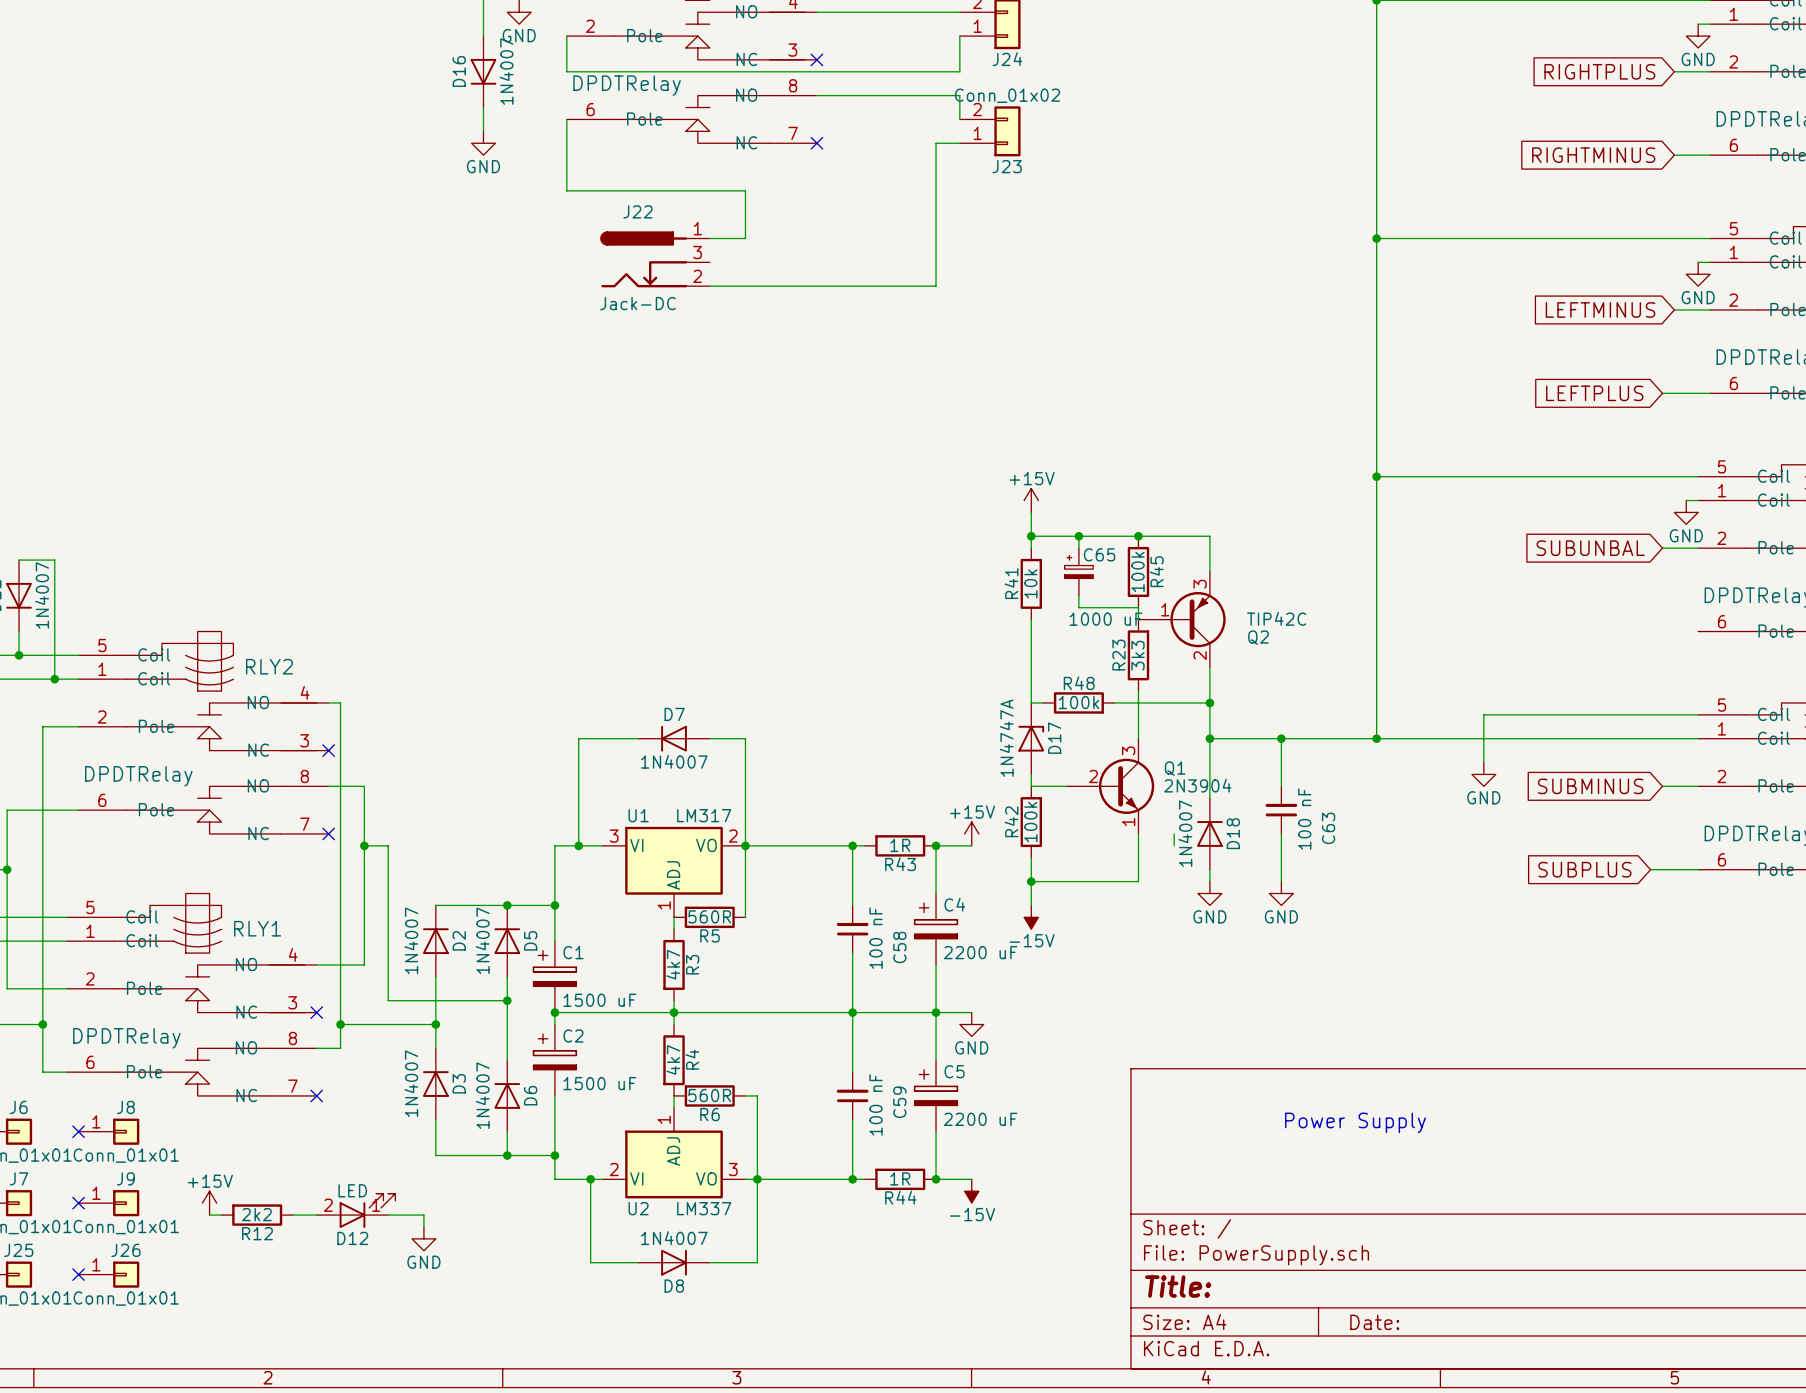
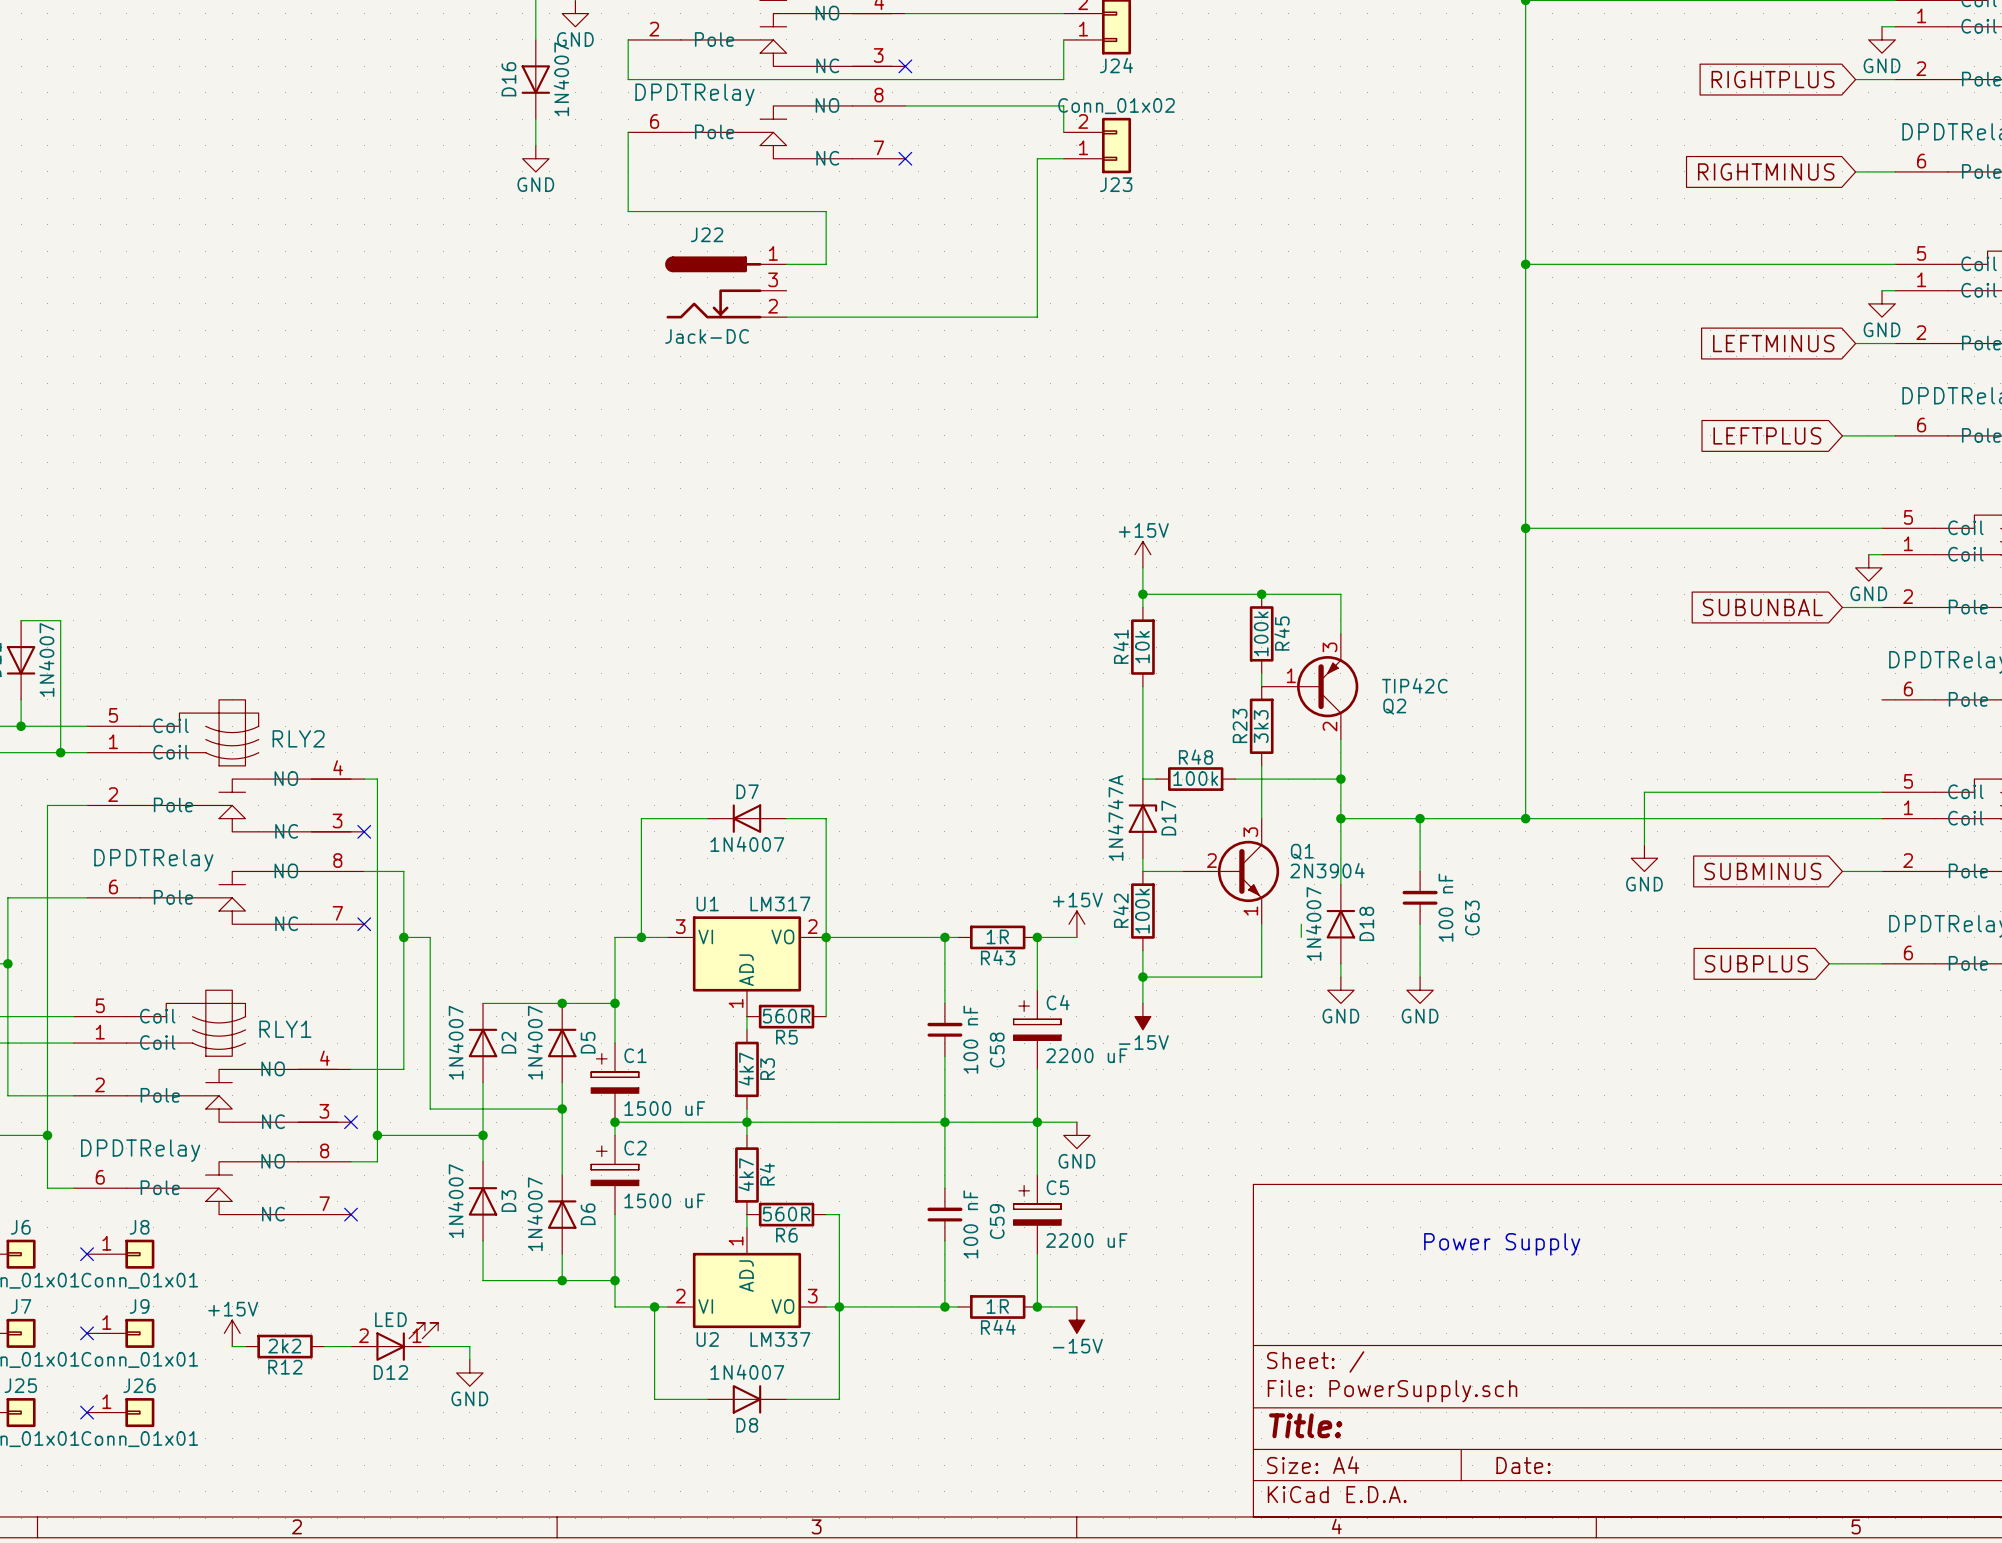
wire: (1078, 536) (1078, 548) -> none
junction: (1078, 536) -> none
C65: 1000 uF (1078, 571) -> none
wire: (1078, 595) (1078, 607) (1138, 607) -> none

